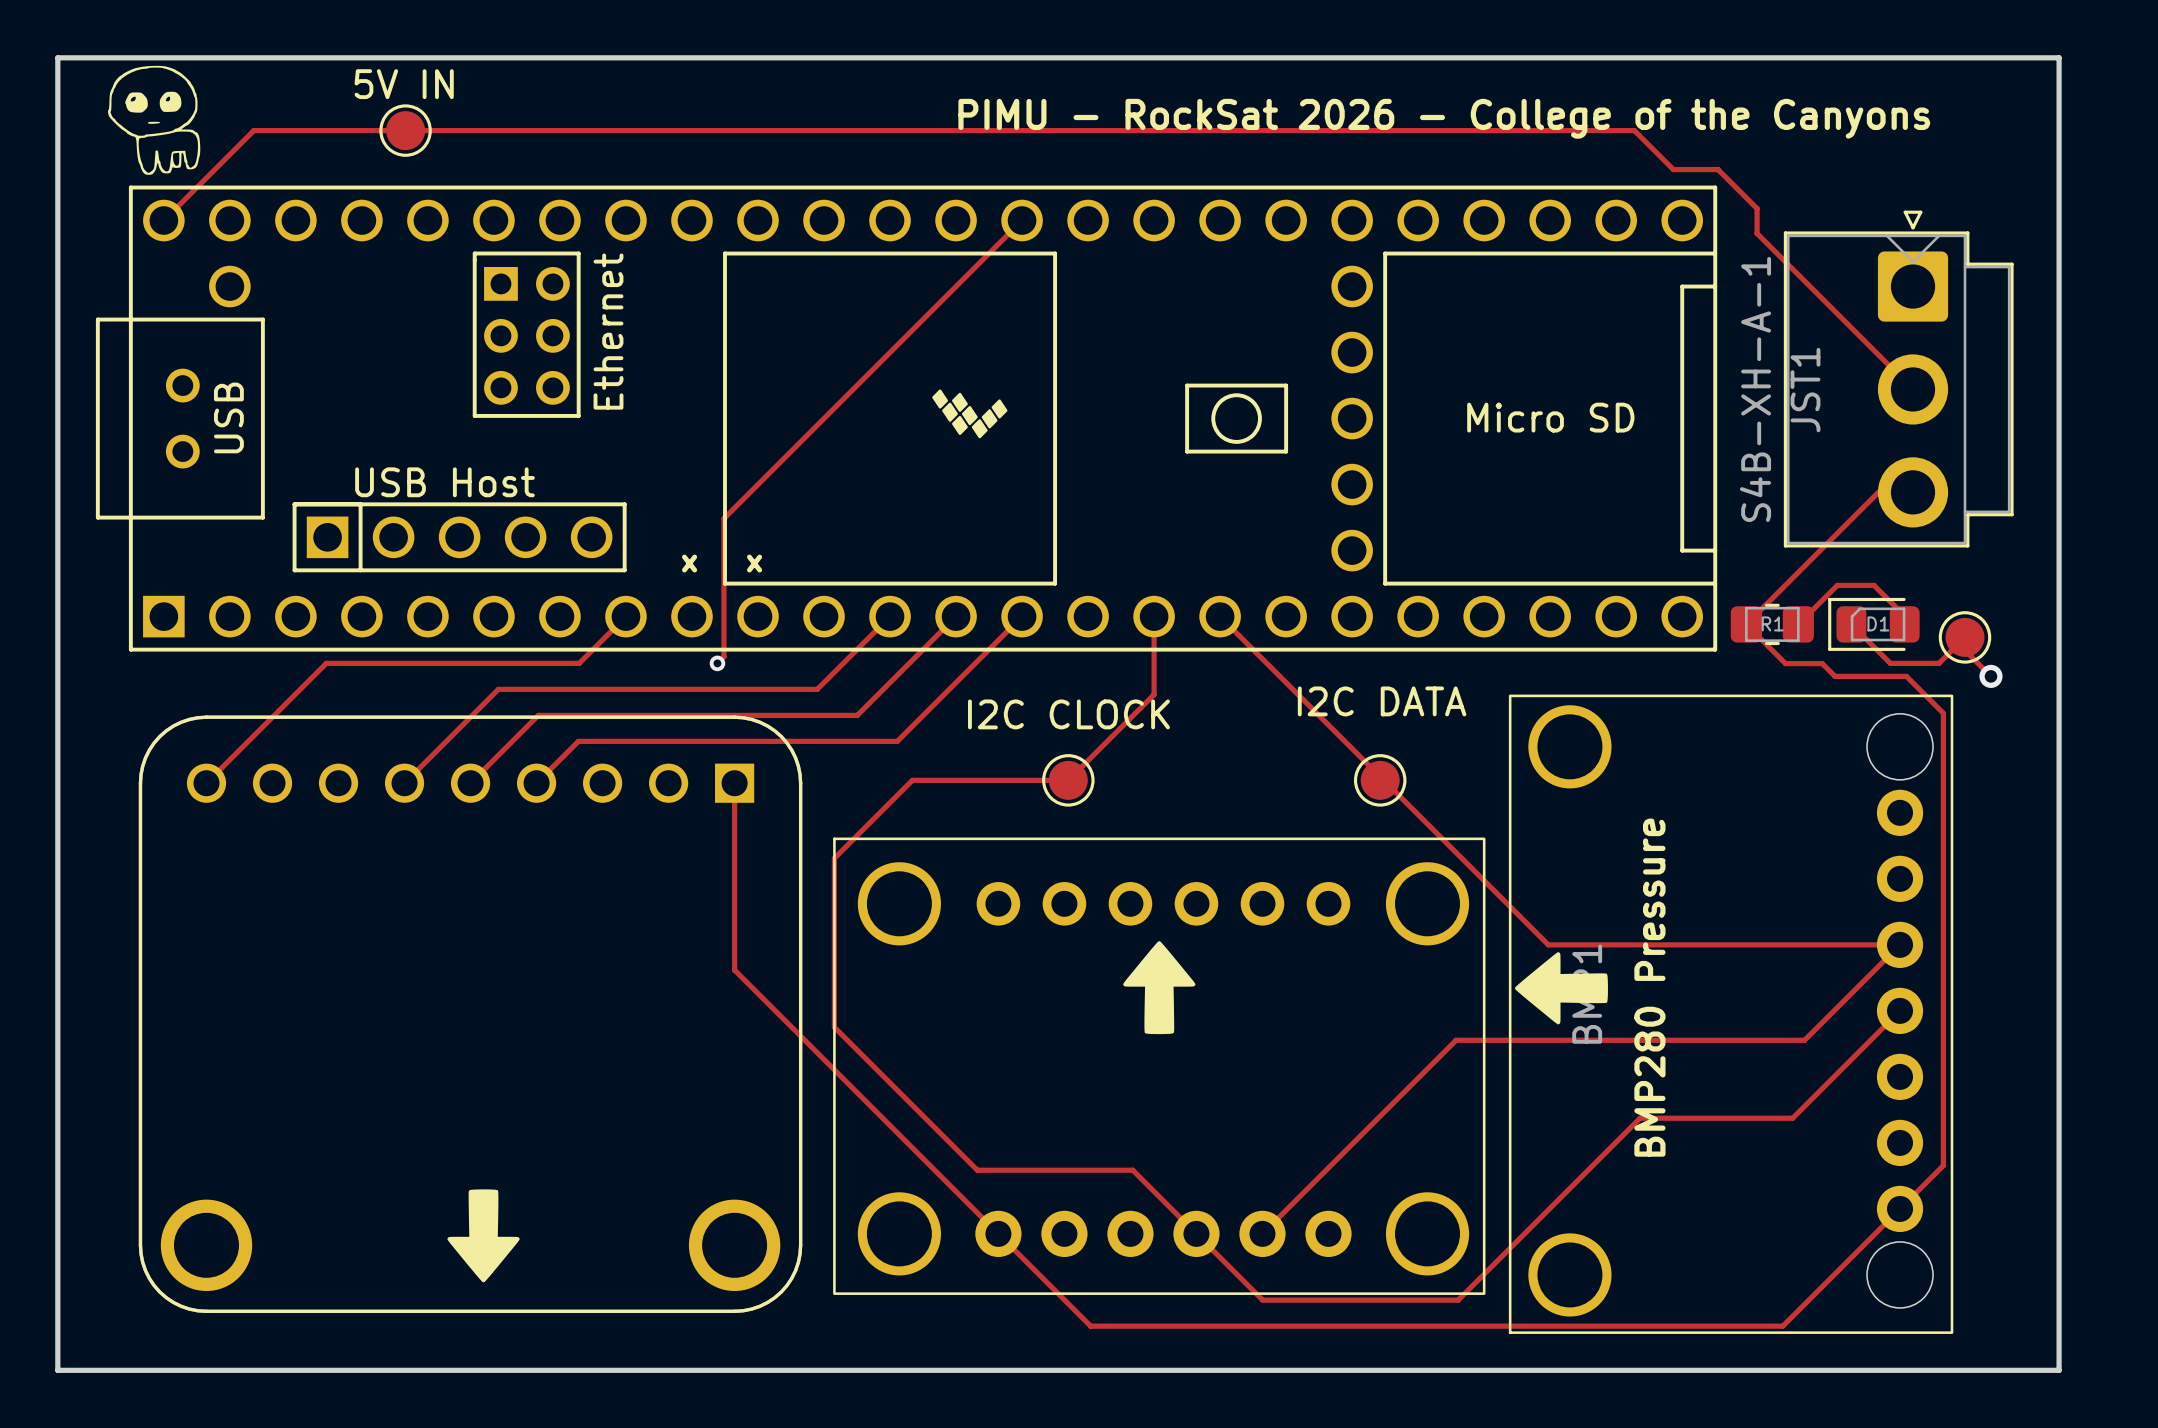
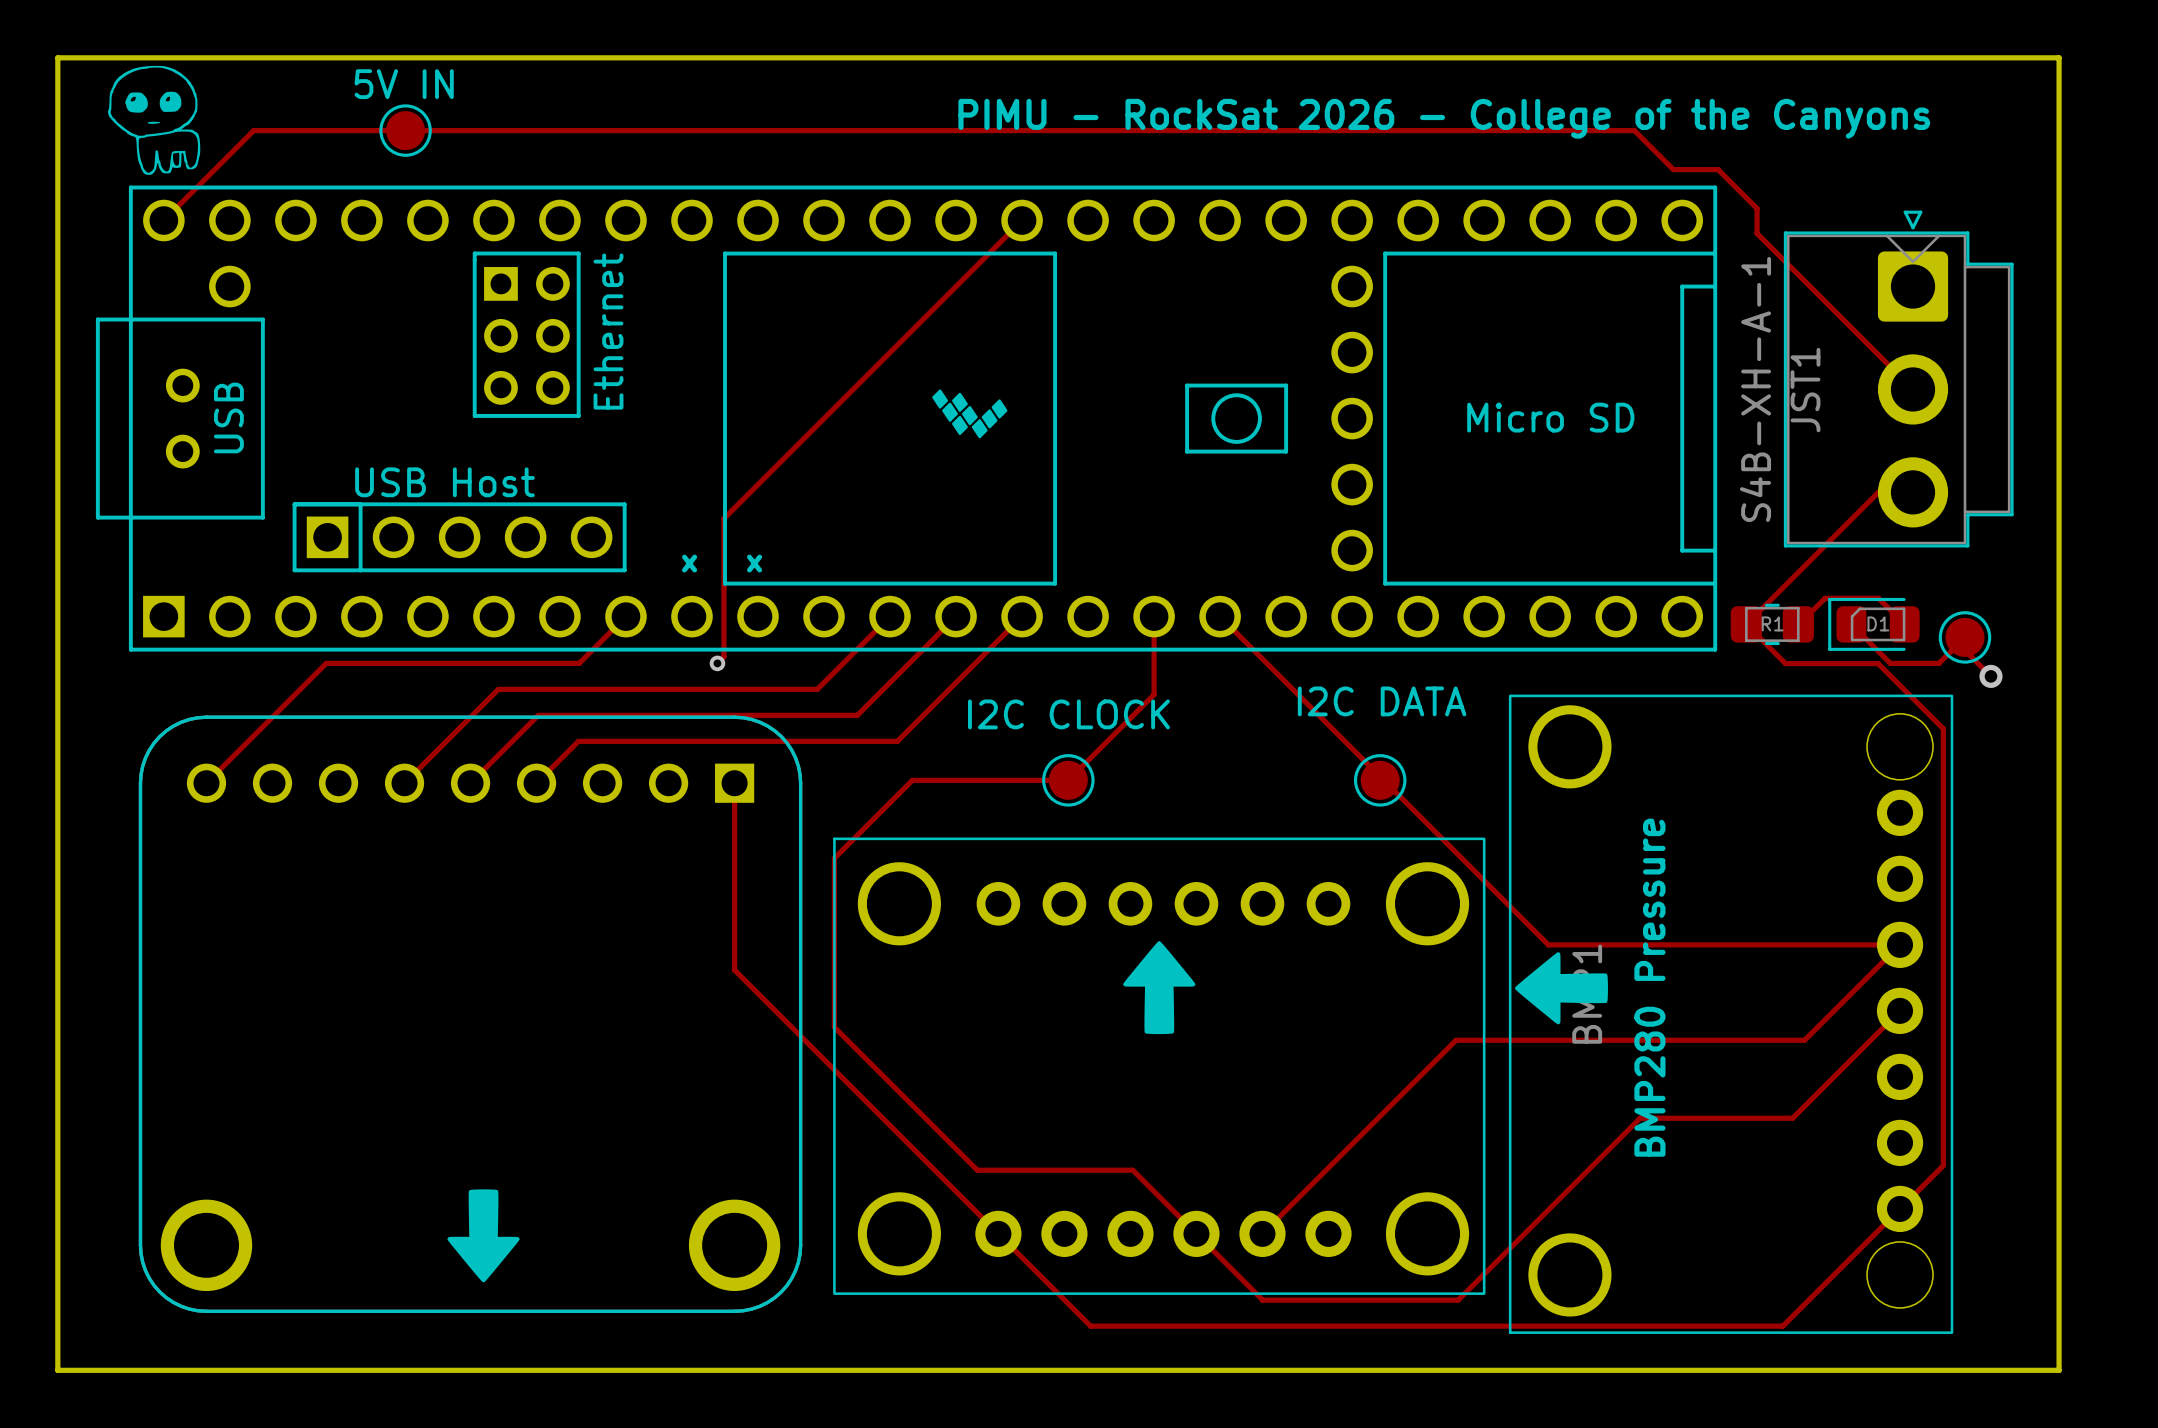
track: (1798, 624) (1837, 585) (1874, 585) (1904, 616) (1904, 624) -> (1798, 624) (1825, 598) (1878, 598) (1904, 624)
track: (1822, 663) (1835, 676) (1906, 676) (1943, 713) (1943, 728) -> (1822, 663) (1878, 663) (1943, 728)

